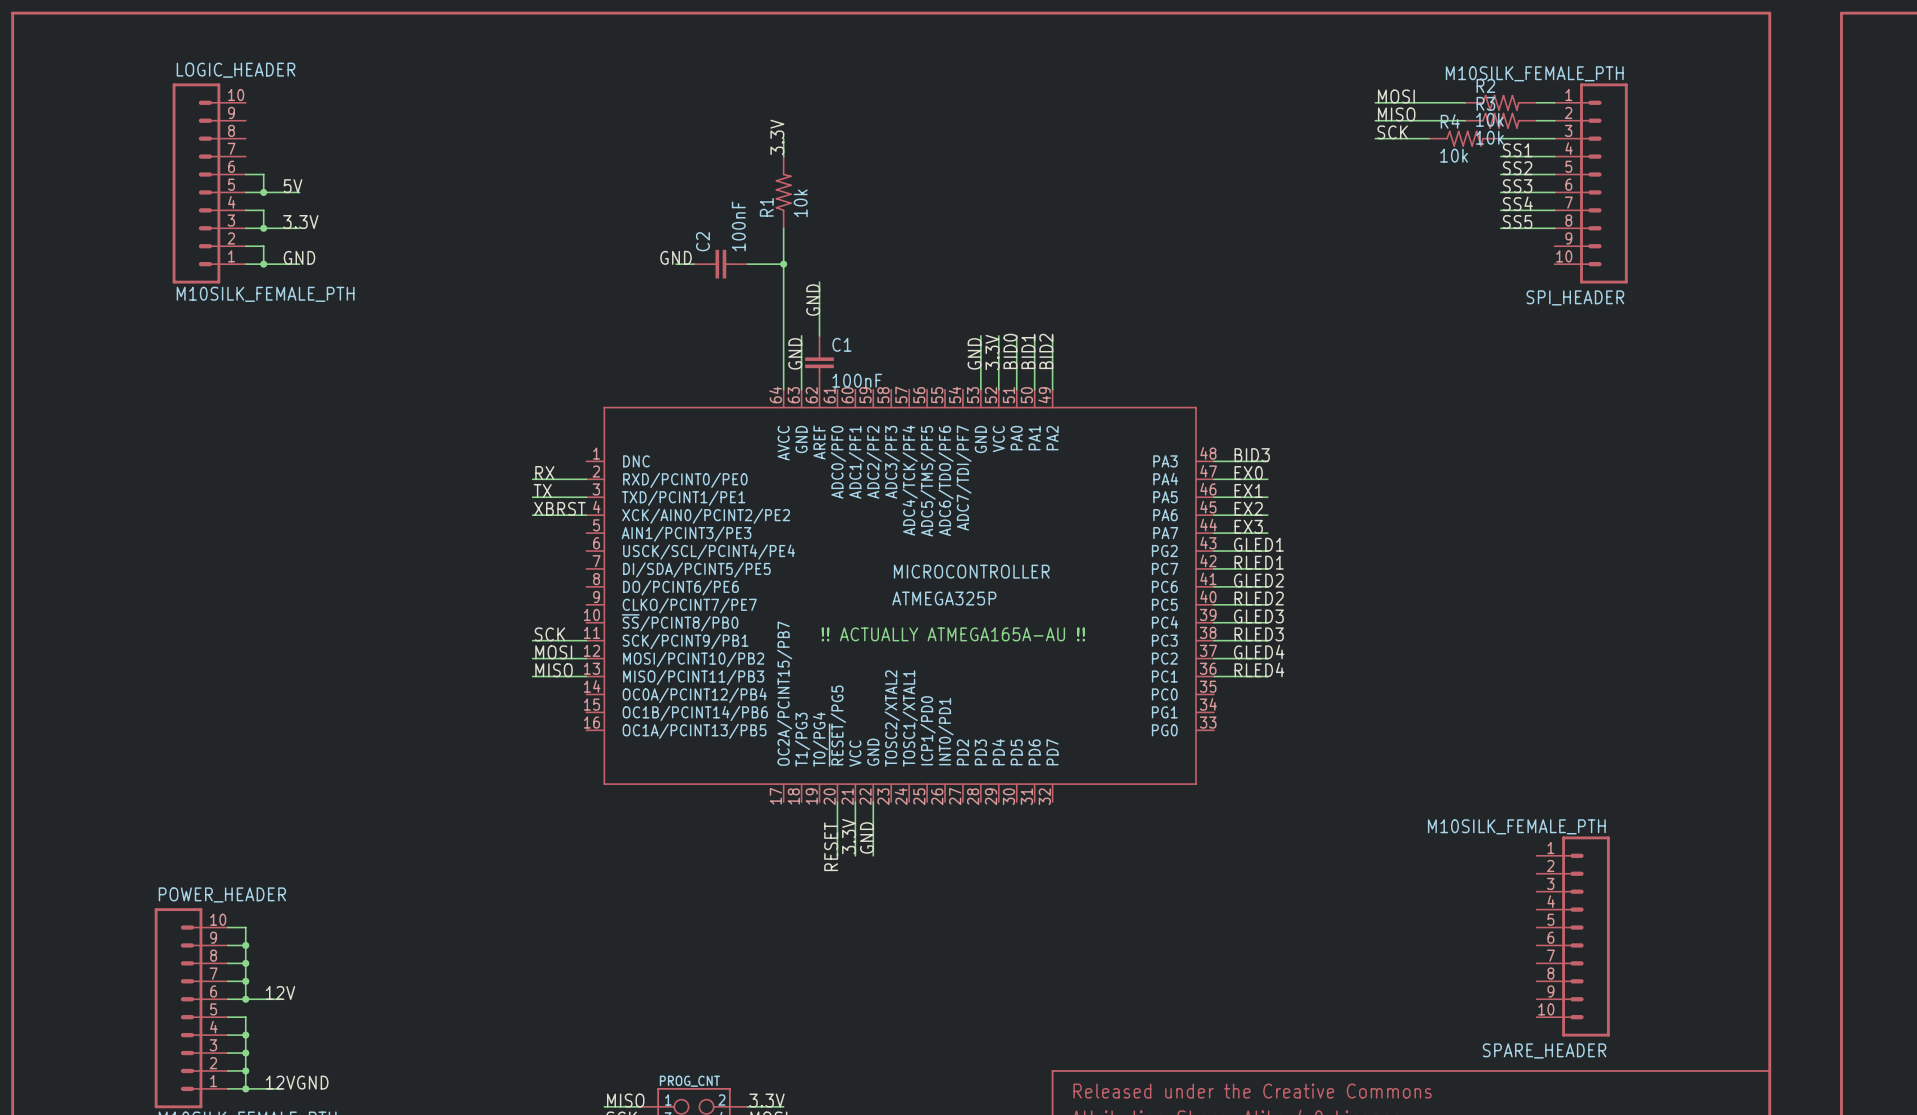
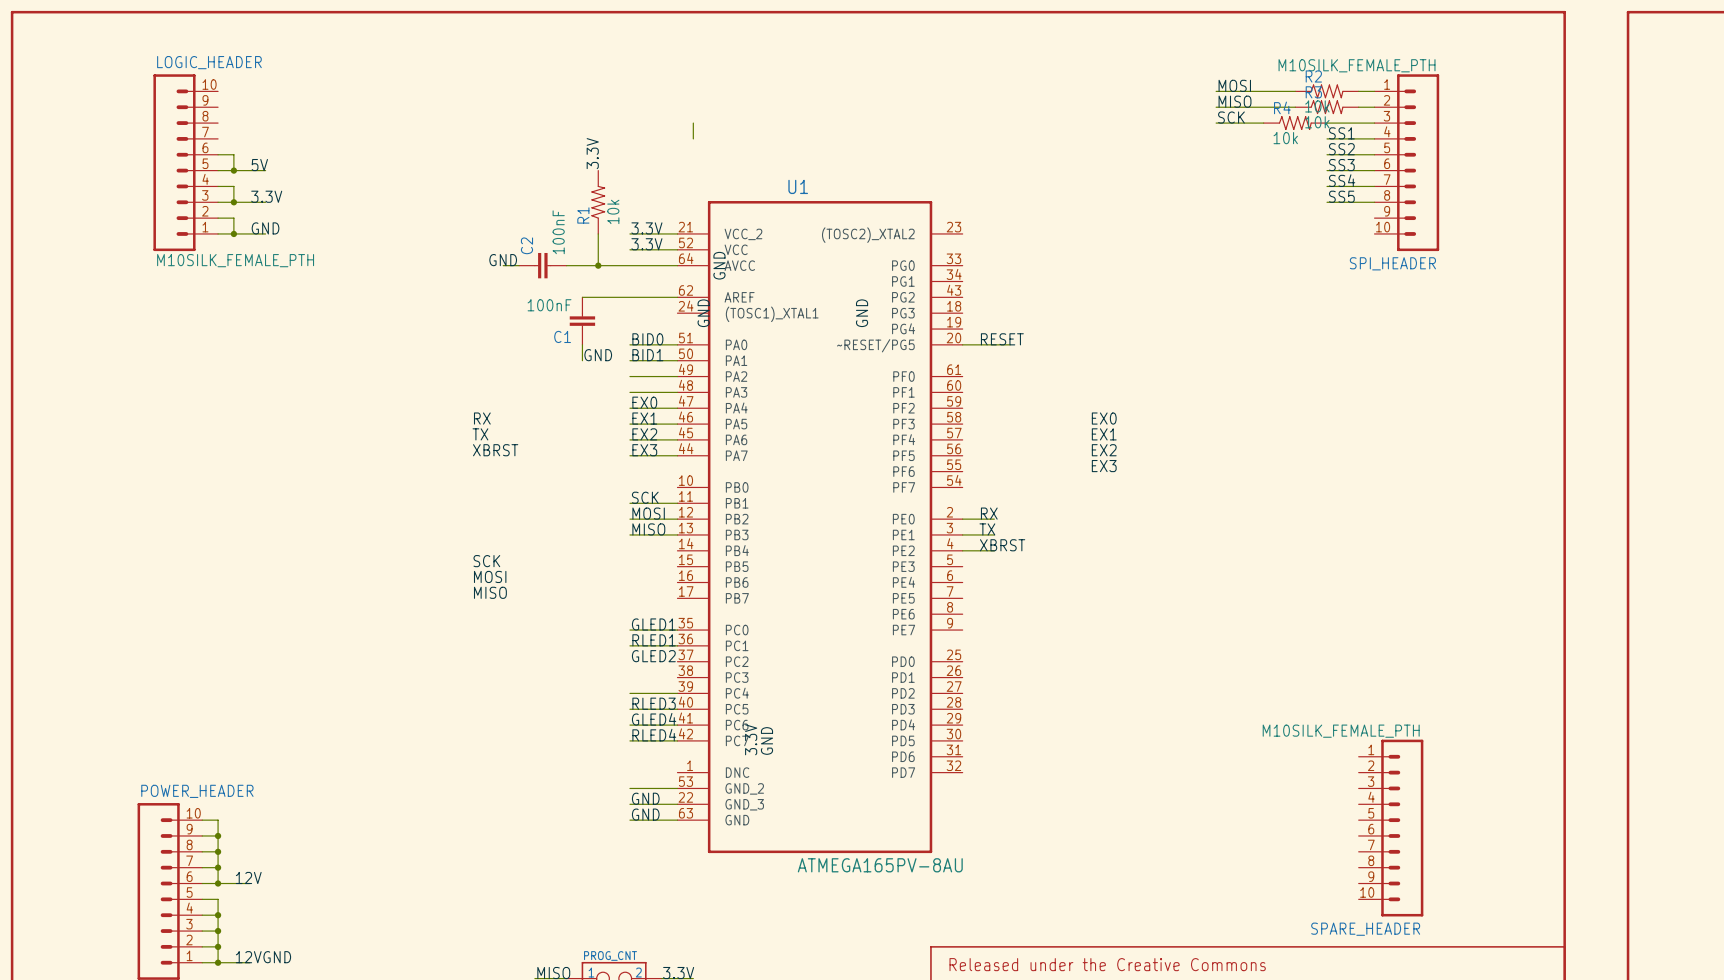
label: 3.3V (777, 137) -> none
label: none -> 3.3V (592, 153)
R1 position: (783, 192) -> (598, 202)
wire: (783, 228) (783, 389) -> none
label: GND (676, 257) -> none
label: none -> 3.3V (646, 228)
wire: (676, 264) (694, 264) -> (598, 233) (598, 265)
C2 position: (720, 264) -> (542, 265)
junction: (783, 264) -> none
label: none -> 3.3V (646, 244)
wire: none -> (629, 249) (677, 249)
wire: (819, 282) (819, 335) -> none
label: none -> GND (503, 260)
wire: none -> (503, 265) (519, 265)
wire: none -> (566, 265) (677, 265)
junction: none -> (598, 265)
wire: none -> (582, 297) (677, 297)
wire: (980, 335) (980, 389) -> none
wire: (998, 335) (998, 389) -> none
wire: (1016, 335) (1016, 389) -> none
wire: (1034, 335) (1034, 389) -> none
C1 name position: C1 (841, 344) -> C1 (562, 336)
label: BID0 (1010, 351) -> none
label: BID1 (1028, 351) -> none
label: BID2 (1046, 351) -> none
label: 3.3V (992, 352) -> none
C1 position: (819, 362) -> (582, 321)
C1 value position: 100nF (857, 380) -> 100nF (549, 305)
label: none -> BID0 (647, 339)
label: none -> RESET (1002, 339)
wire: none -> (582, 344) (582, 360)
wire: none -> (629, 344) (677, 344)
label: none -> GND (598, 355)
label: none -> BID1 (647, 355)
wire: none -> (629, 376) (677, 376)
wire: none -> (629, 392) (677, 392)
label: none -> EX0 (644, 402)
label: BID3 (1252, 455) -> none
wire: none -> (629, 408) (677, 408)
wire: (1213, 461) (1267, 461) -> (962, 344) (1010, 344)
label: none -> EX1 (644, 418)
wire: (532, 479) (586, 479) -> none
wire: none -> (629, 424) (677, 424)
wire: (1213, 479) (1267, 479) -> none
label: none -> EX2 (644, 434)
wire: (532, 497) (586, 497) -> none
wire: none -> (629, 439) (677, 439)
wire: (1213, 497) (1267, 497) -> none
label: none -> EX3 (644, 450)
wire: (532, 515) (586, 515) -> none
wire: none -> (629, 455) (677, 455)
wire: (1213, 515) (1267, 515) -> none
wire: (1213, 533) (1267, 533) -> none
label: GLED1 (1258, 544) -> none
wire: (1213, 551) (1267, 551) -> none
label: none -> SCK (645, 497)
label: RLED1 (1259, 562) -> none
wire: none -> (629, 503) (677, 503)
wire: (1213, 568) (1267, 568) -> none
label: none -> MOSI (648, 513)
label: none -> RX (989, 513)
label: GLED2 (1258, 580) -> none
wire: none -> (629, 519) (677, 519)
wire: none -> (962, 519) (994, 519)
wire: (1213, 586) (1267, 586) -> none
MICROCONTROLLER: ATMEGA325P (900, 595) -> none
U1: none -> ATMEGA165PV-8AU (820, 527)
label: none -> MISO (648, 529)
label: none -> TX (987, 529)
label: RLED2 (1259, 598) -> none
wire: none -> (629, 534) (677, 534)
wire: none -> (962, 534) (994, 534)
wire: (1213, 604) (1267, 604) -> none
label: none -> XBRST (1002, 545)
label: GLED3 (1258, 616) -> none
wire: none -> (962, 550) (994, 550)
wire: (1213, 622) (1267, 622) -> none
text: !! ACTUALLY ATMEGA165A-AU !! (953, 634) -> none
label: RLED3 (1259, 634) -> none
wire: (532, 640) (586, 640) -> none
wire: (1213, 640) (1267, 640) -> none
label: GLED4 (1259, 652) -> none
wire: (532, 658) (586, 658) -> none
wire: (1213, 658) (1267, 658) -> none
label: RLED4 (1259, 669) -> none
wire: (532, 676) (586, 676) -> none
wire: (1213, 676) (1267, 676) -> none
label: none -> GLED1 (653, 624)
wire: none -> (629, 630) (677, 630)
label: none -> RLED1 (654, 640)
wire: none -> (629, 645) (677, 645)
label: none -> GLED2 (653, 656)
label: none -> RLED3 (654, 703)
wire: none -> (629, 709) (677, 709)
wire: (837, 802) (837, 855) -> none
wire: (855, 802) (855, 855) -> none
wire: (873, 802) (873, 855) -> none
label: none -> GLED4 (654, 719)
wire: none -> (629, 725) (677, 725)
label: none -> RLED4 (654, 735)
wire: none -> (629, 740) (677, 740)
label: RESET (831, 846) -> none
wire: none -> (629, 788) (677, 788)
label: none -> GND (645, 798)
wire: none -> (629, 804) (677, 804)
label: none -> GND (645, 814)
wire: none -> (629, 820) (677, 820)

